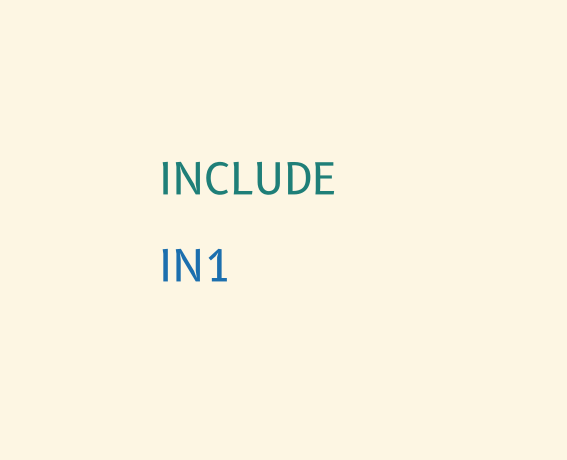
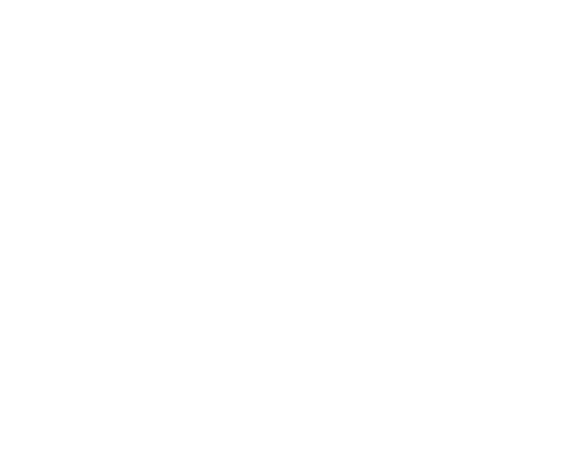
IN1: INCLUDE (248, 221) -> none

